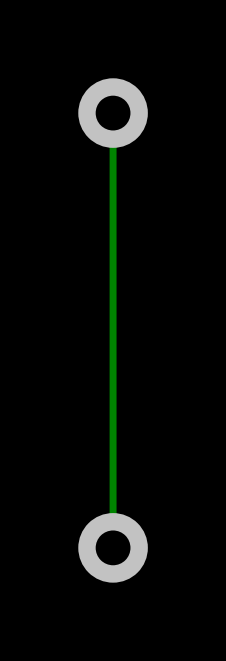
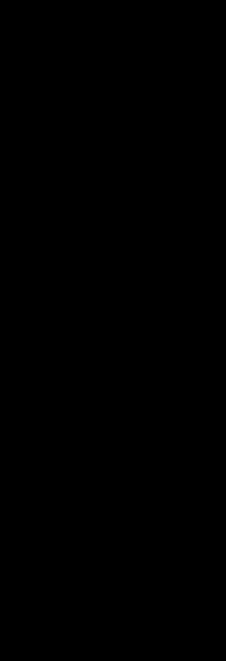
track: (113, 113) (113, 547) -> none
via: (113, 113) -> none
via: (113, 547) -> none

